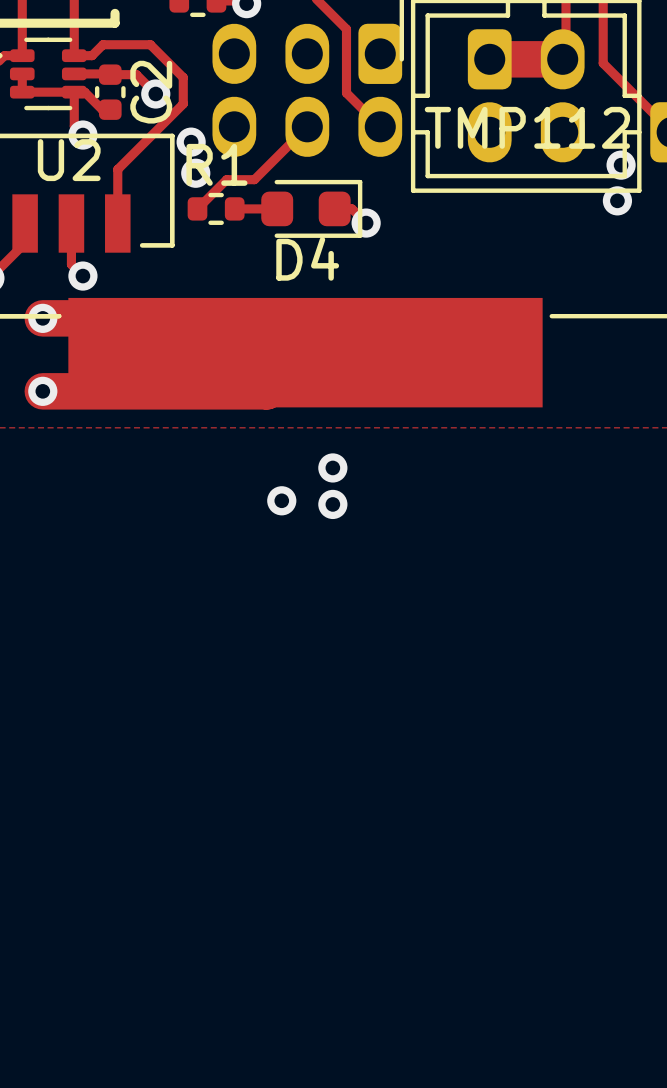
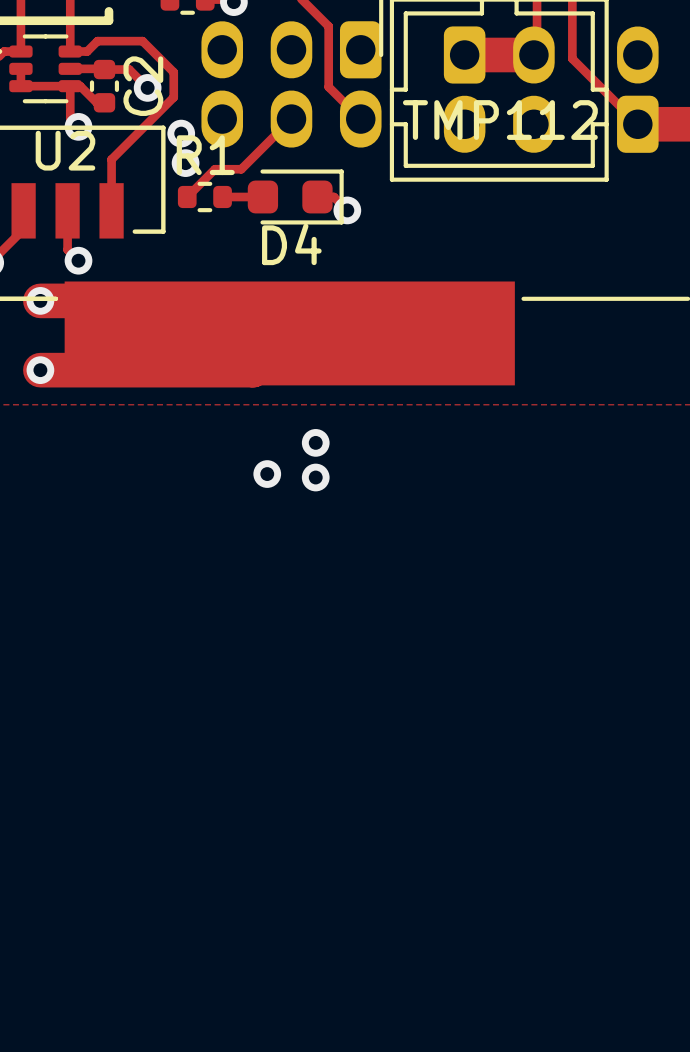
via: (621, 165) -> none
via: (617, 200) -> none

